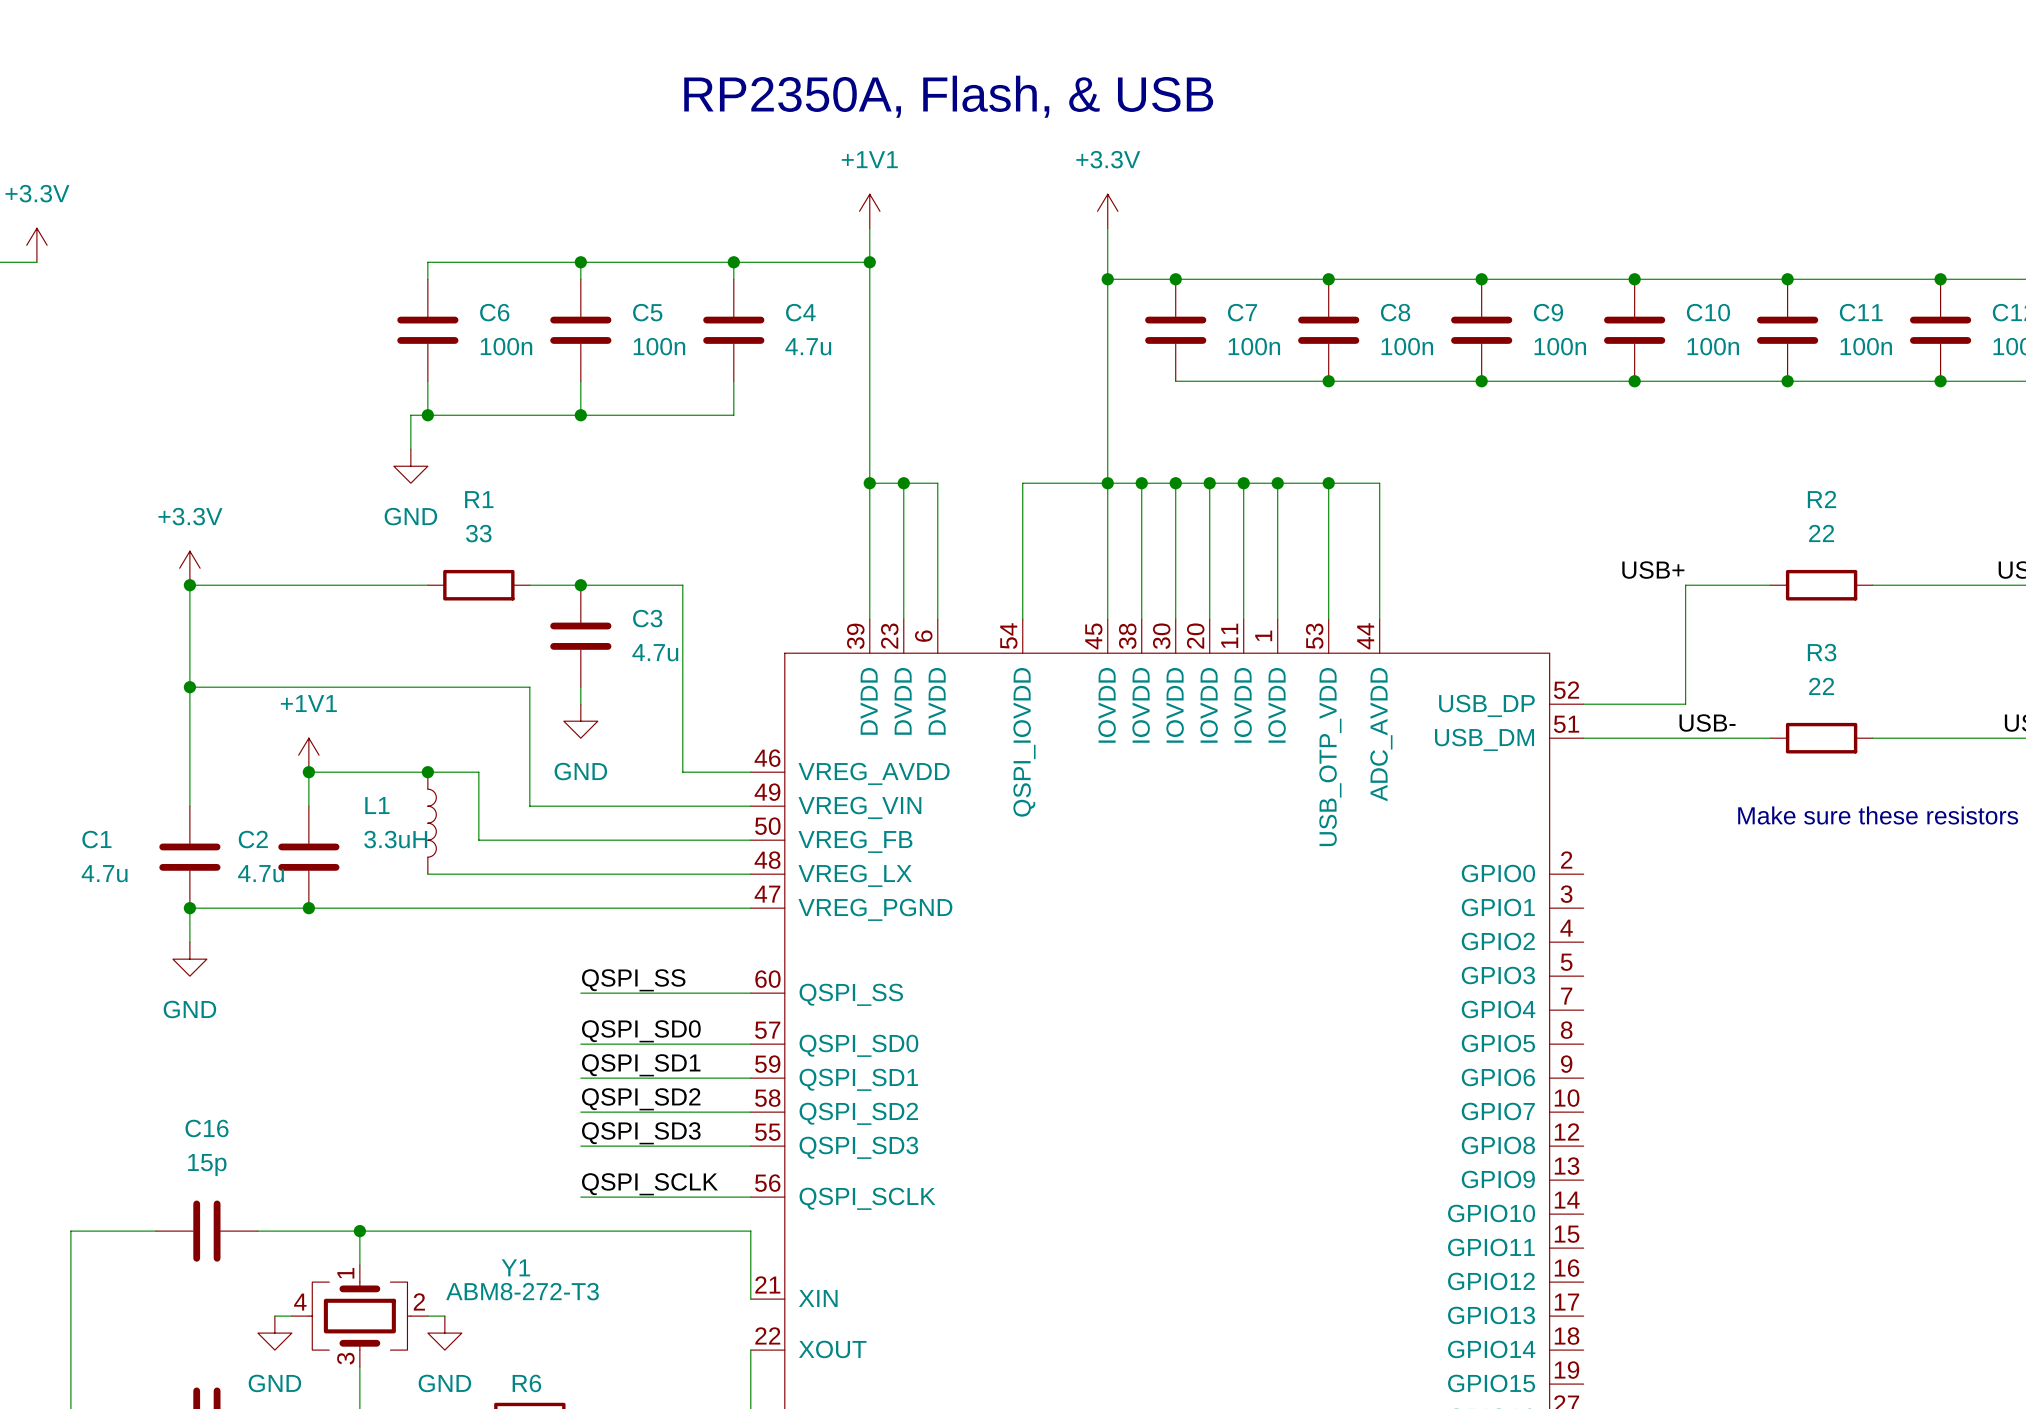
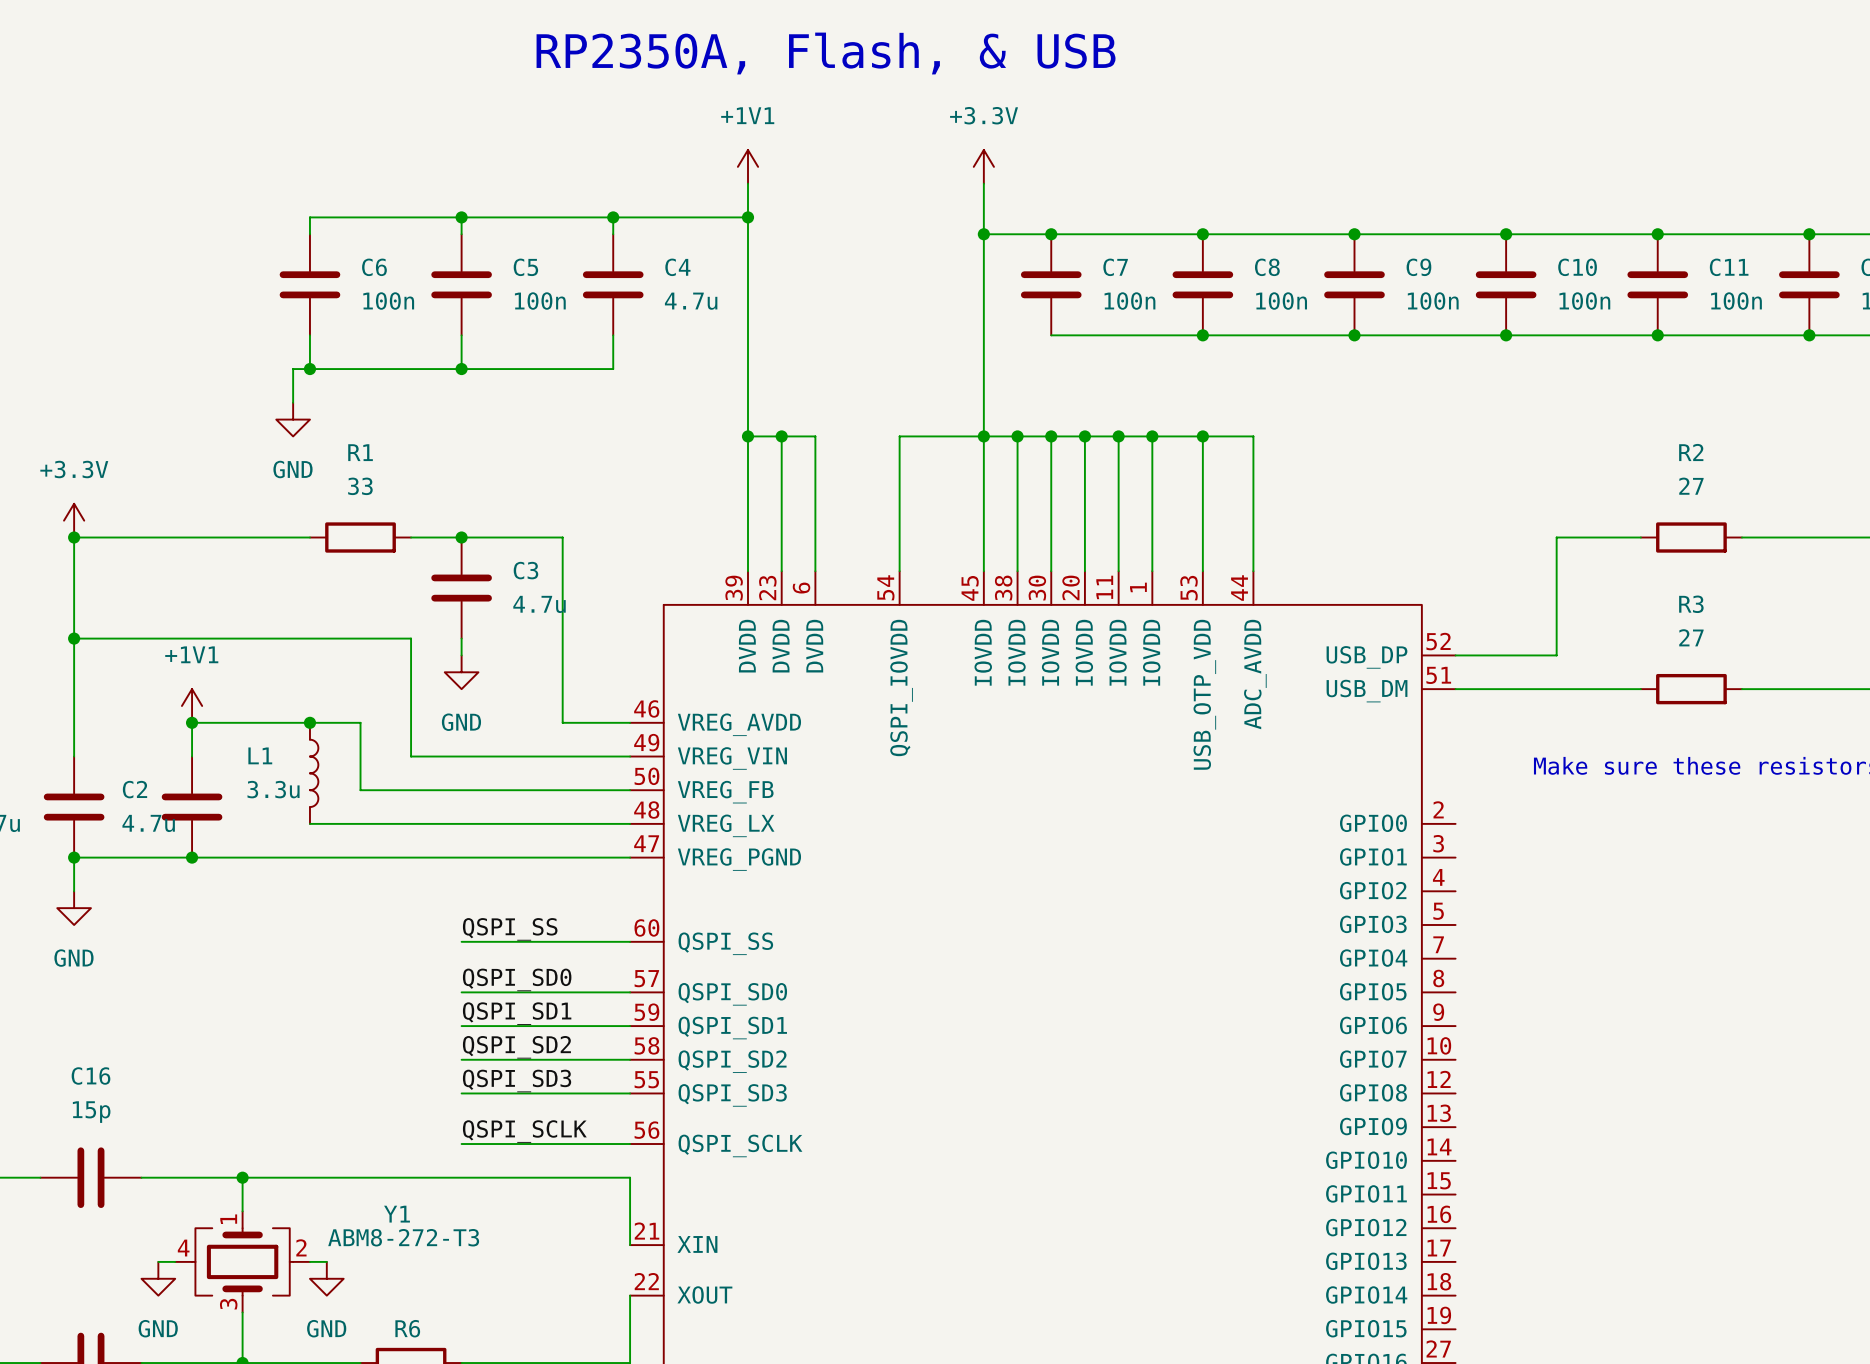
R2 value: 22 (1821, 533) -> 27 (1691, 486)
label: USB+ (1653, 570) -> none
R3 value: 22 (1821, 686) -> 27 (1691, 637)
label: USB- (1707, 723) -> none
L1 value: 3.3uH (395, 839) -> 3.3u (273, 789)

